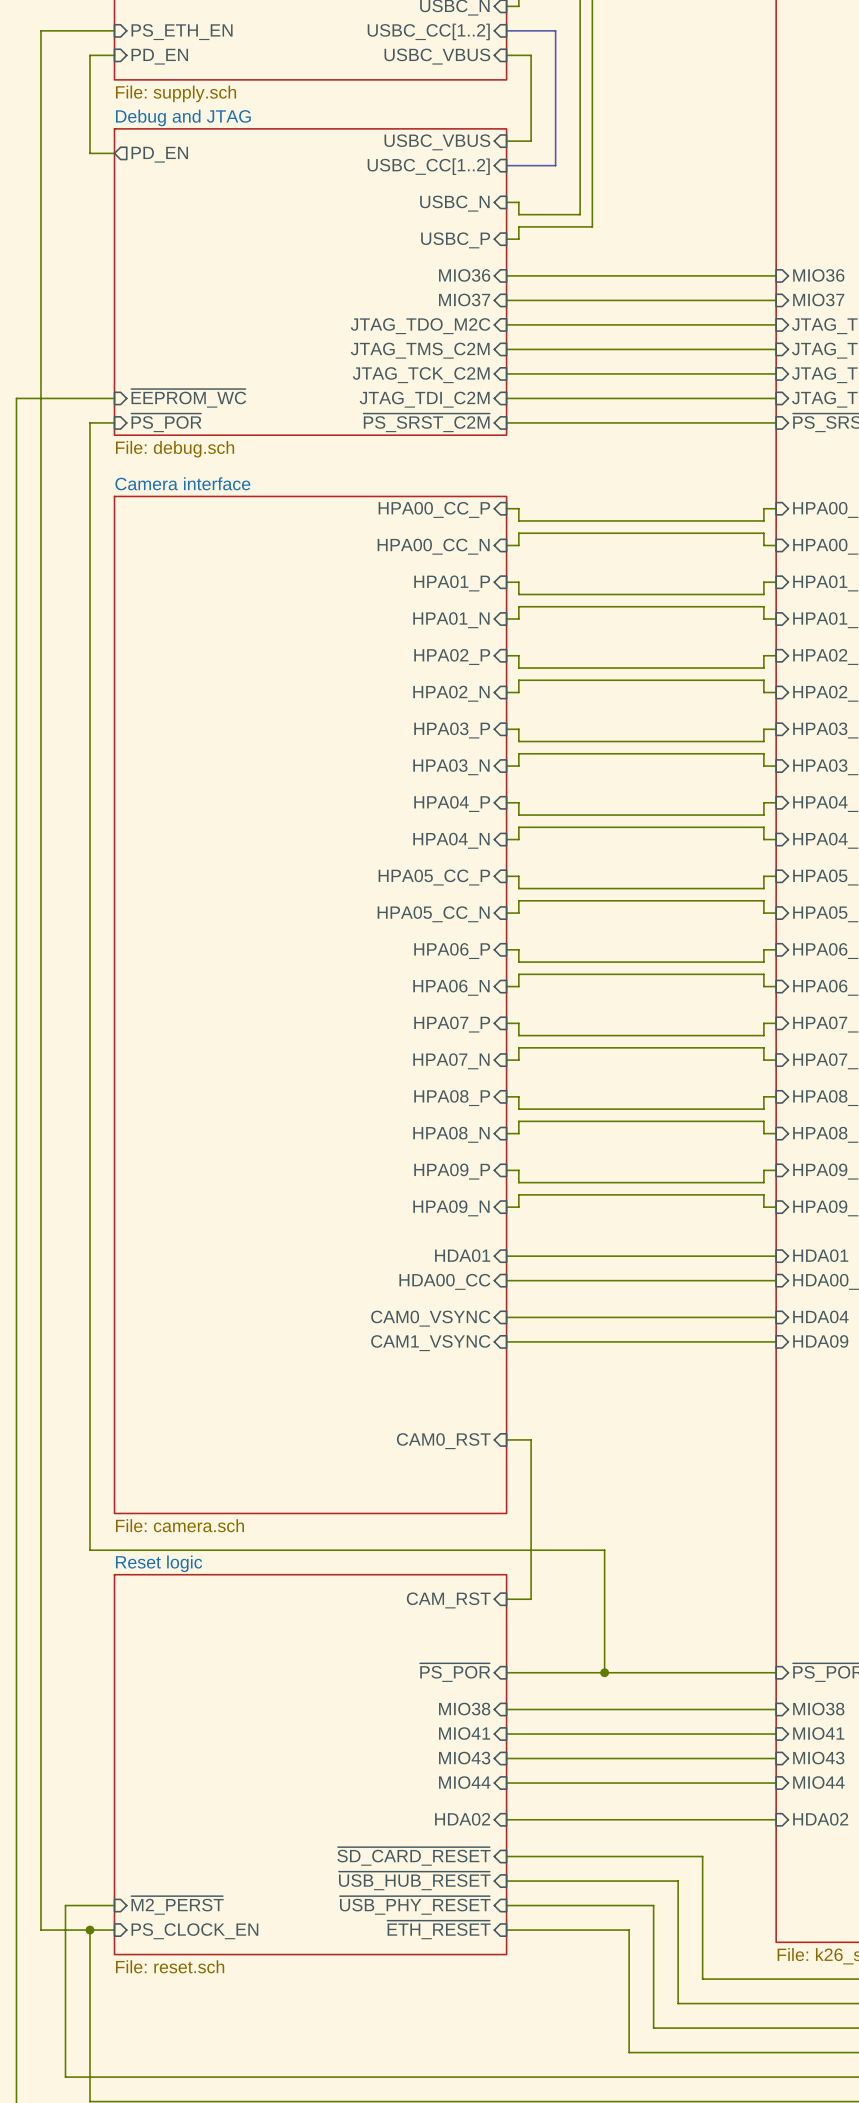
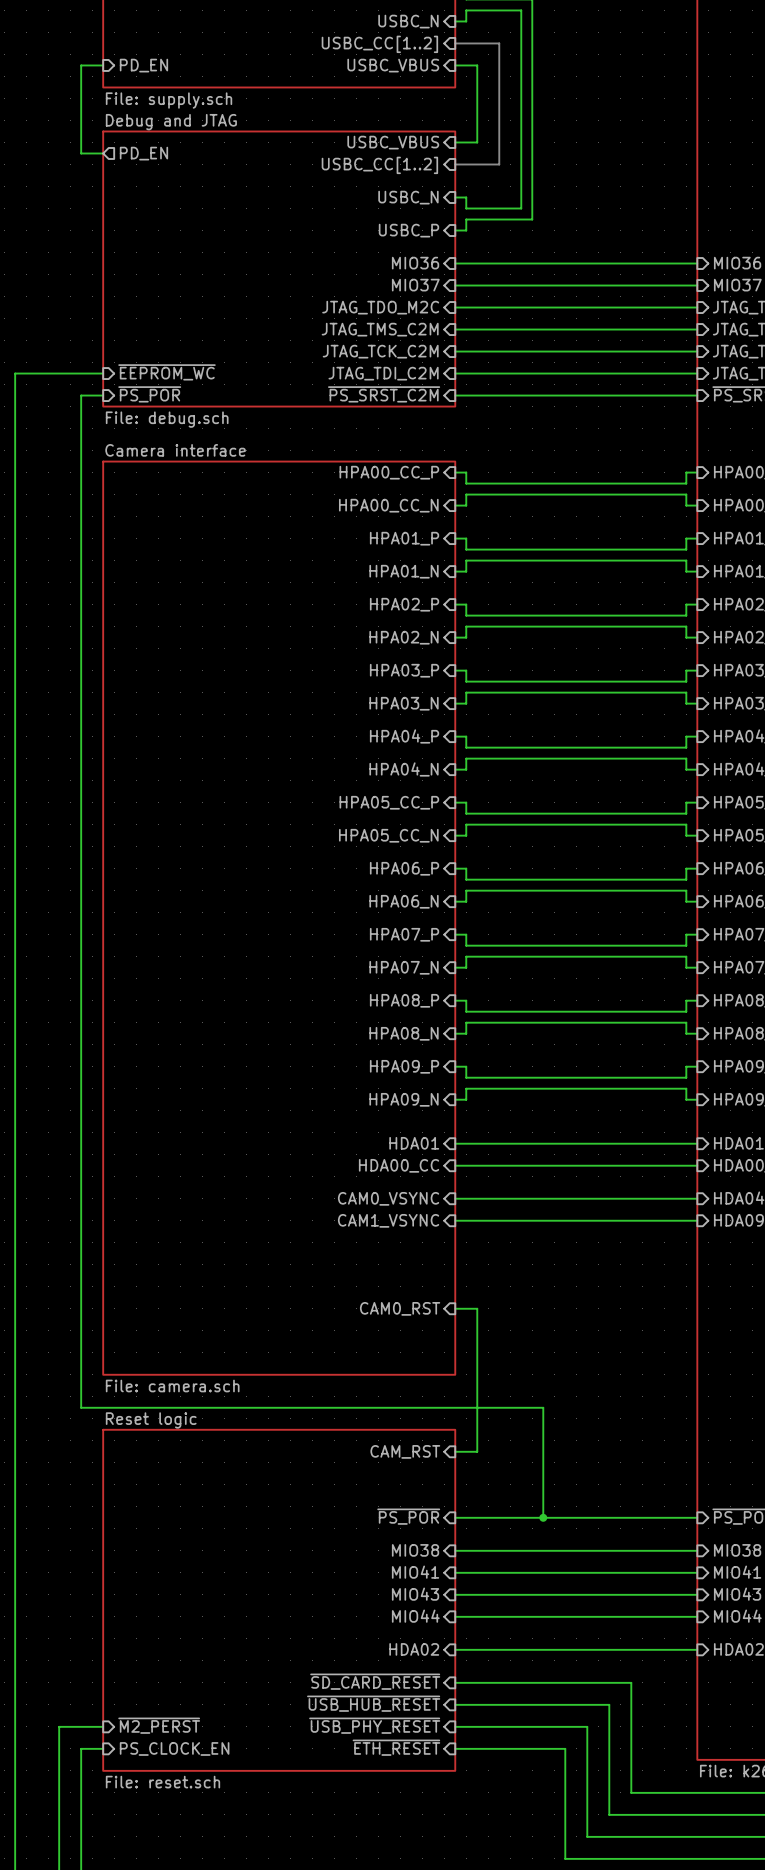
wire: (114, 30) (40, 30) (40, 1930) (90, 1930) -> none
sheet pin: PS_ETH_EN (182, 32) -> none
junction: (90, 1930) -> none

